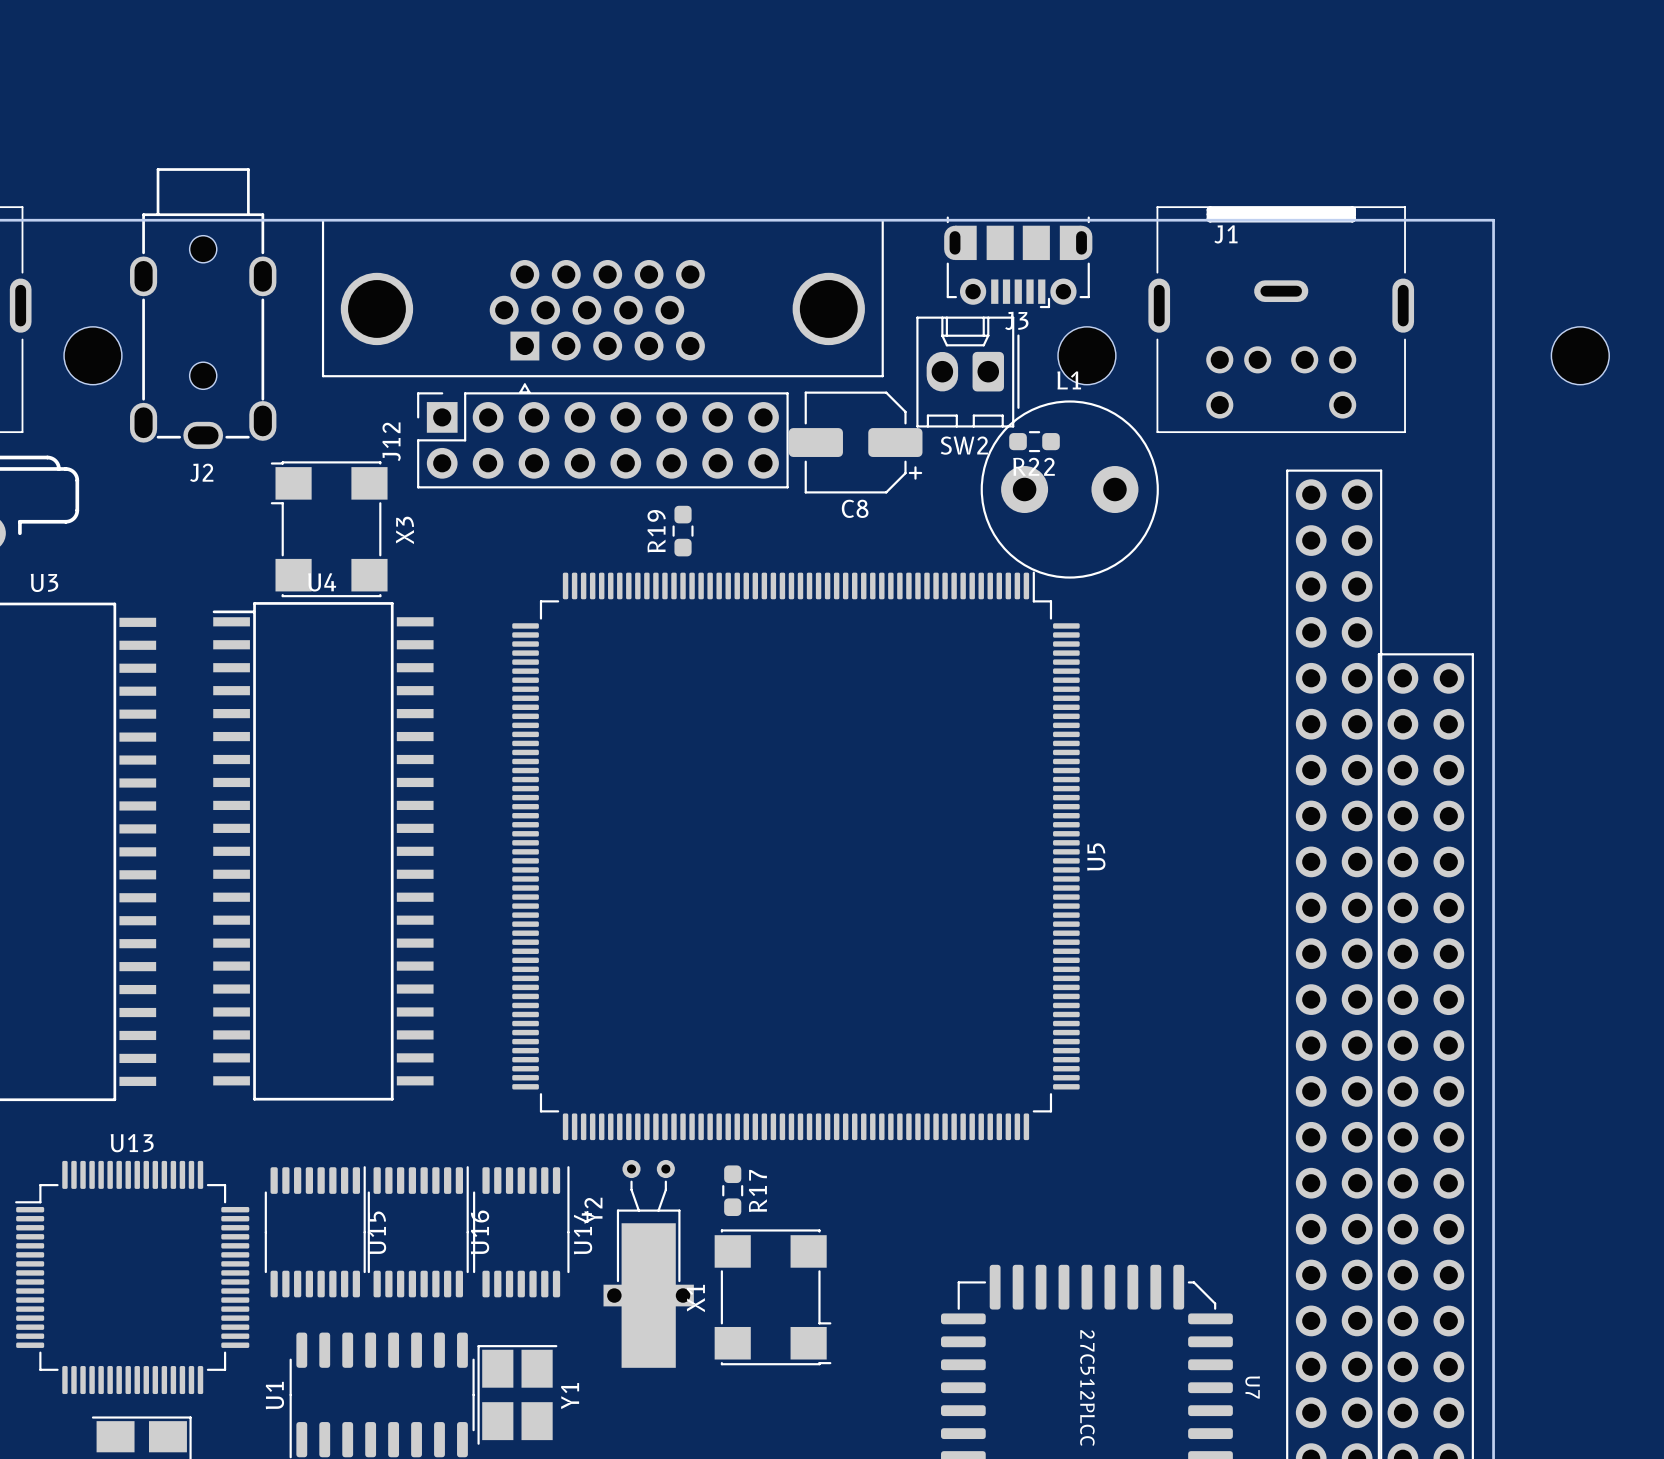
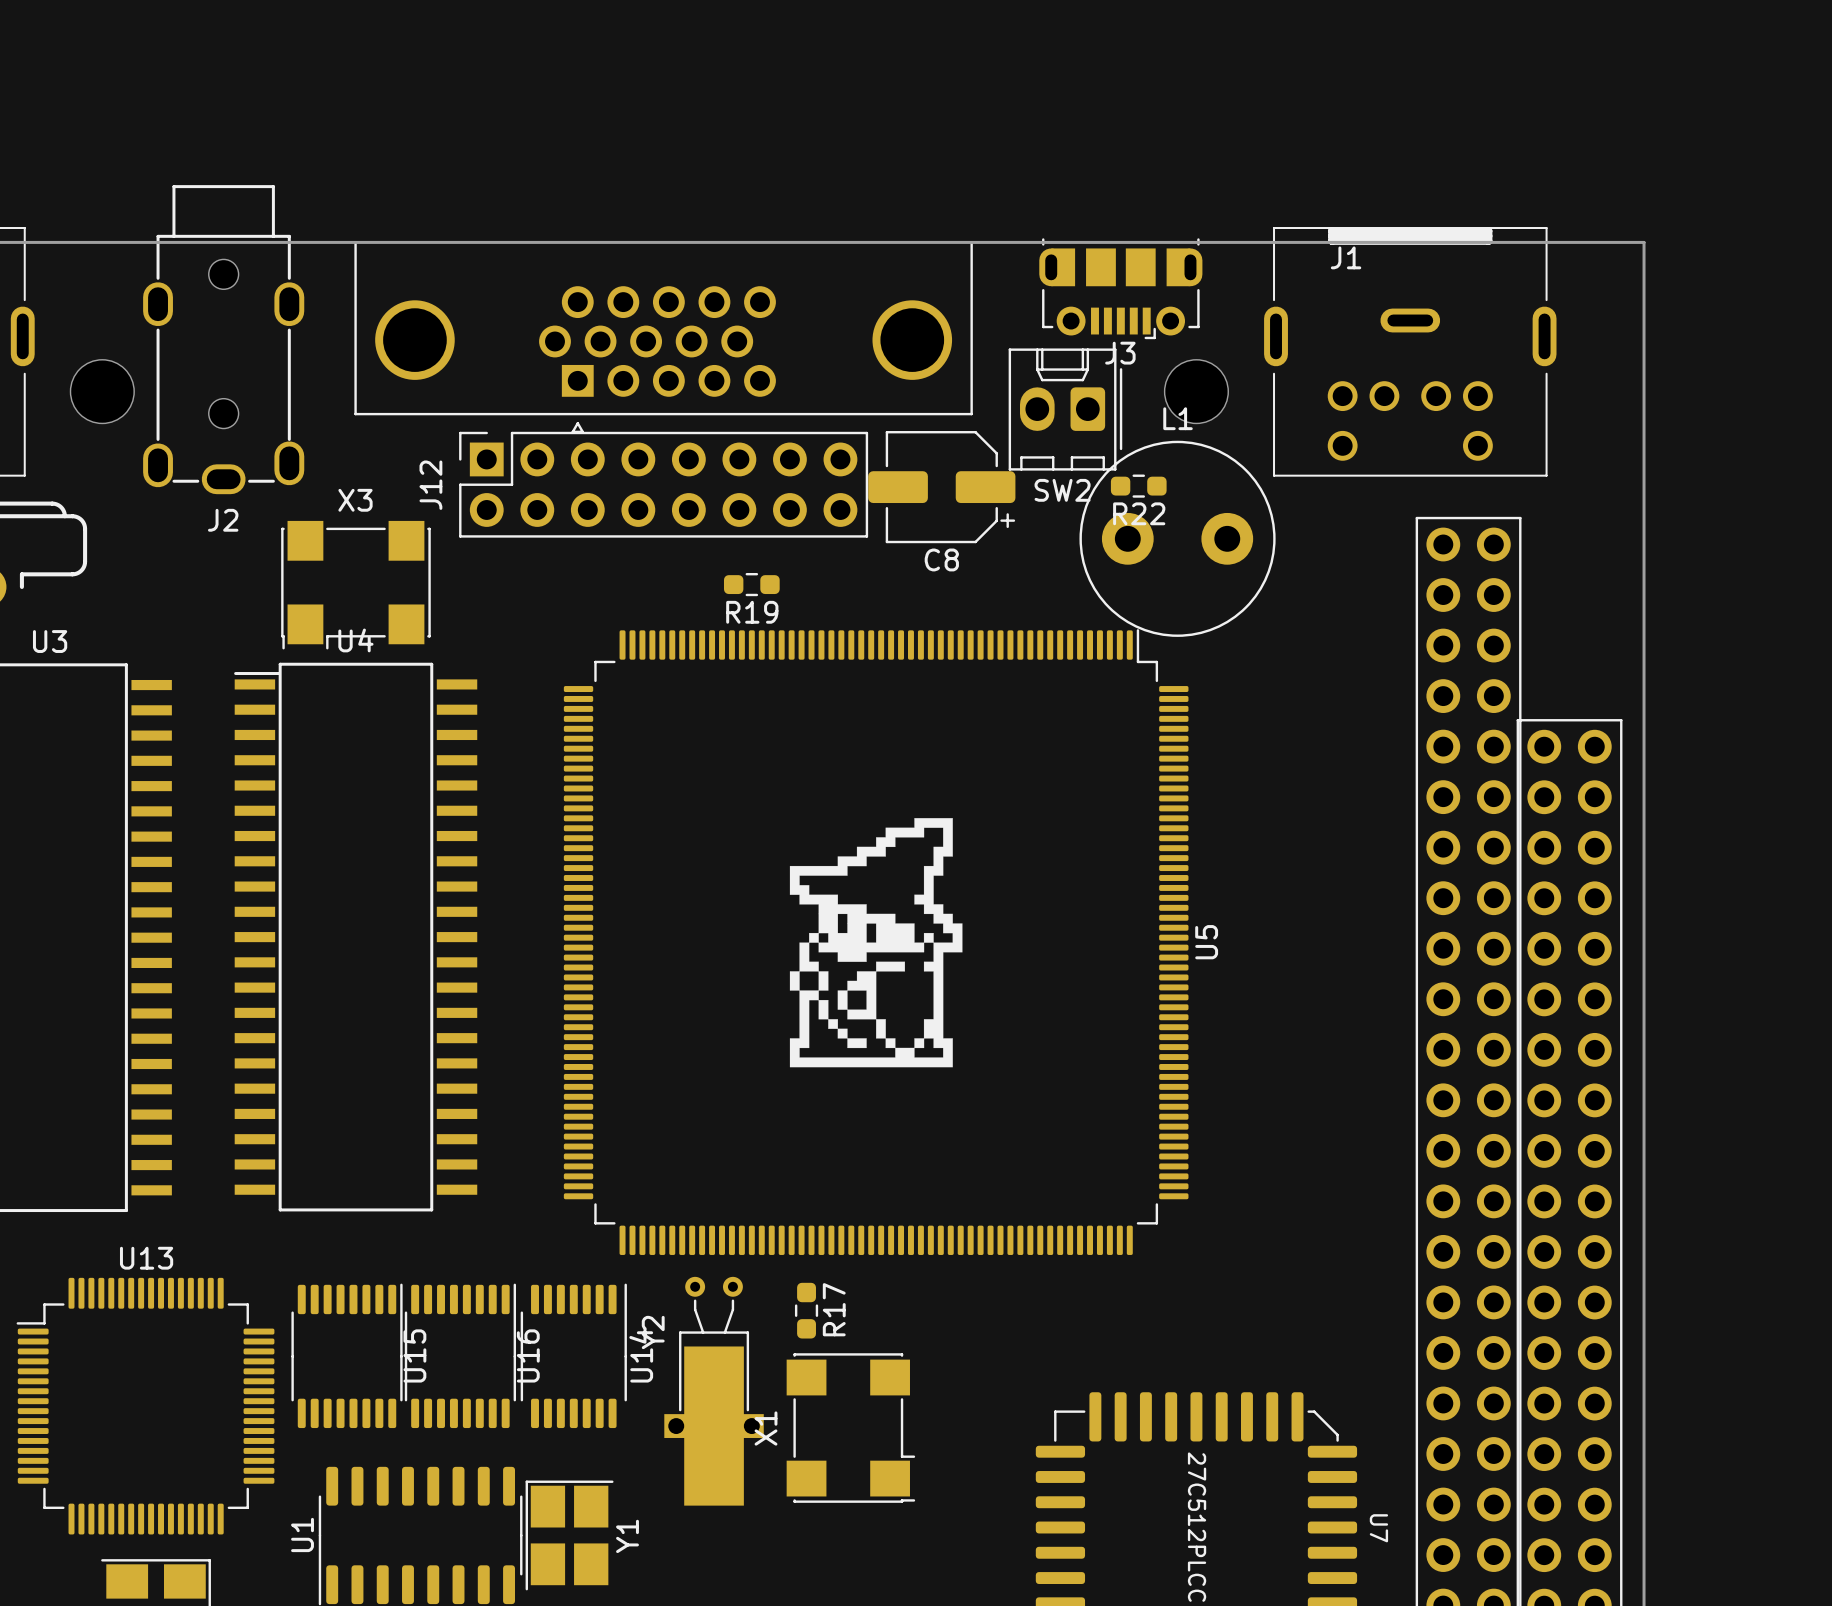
part: (1580, 355) -> none
X3 rotation: 0° (329, 529) -> 90° counterclockwise (355, 585)
R19 name position: R19 (656, 531) -> R19 (752, 612)
R19 rotation: 0° (683, 531) -> 90° clockwise (751, 584)
drawing: none -> [789, 818, 963, 1068]

